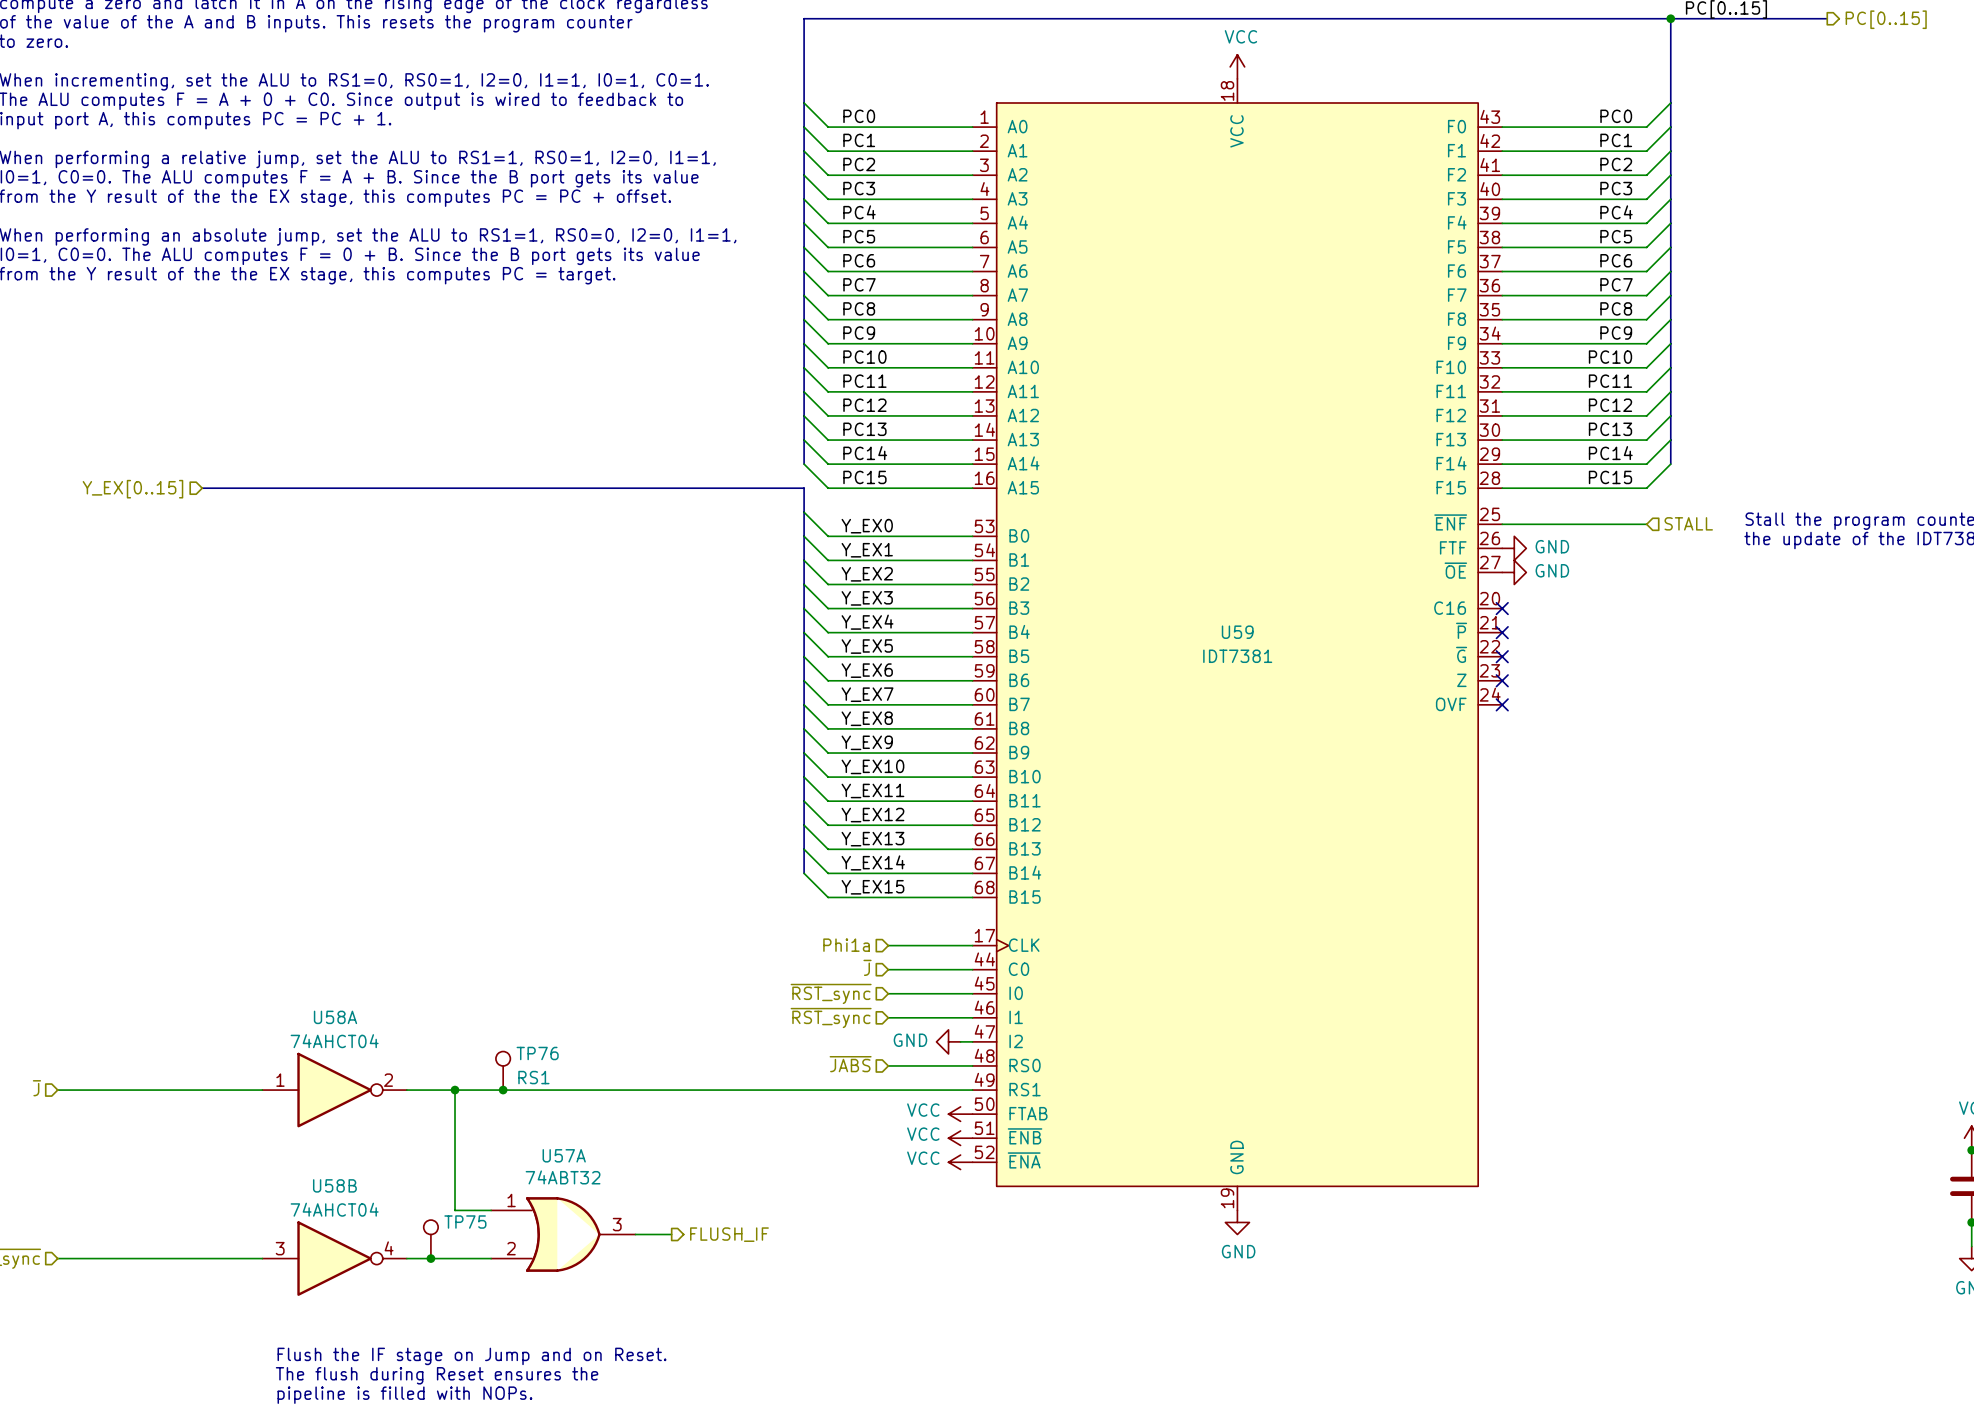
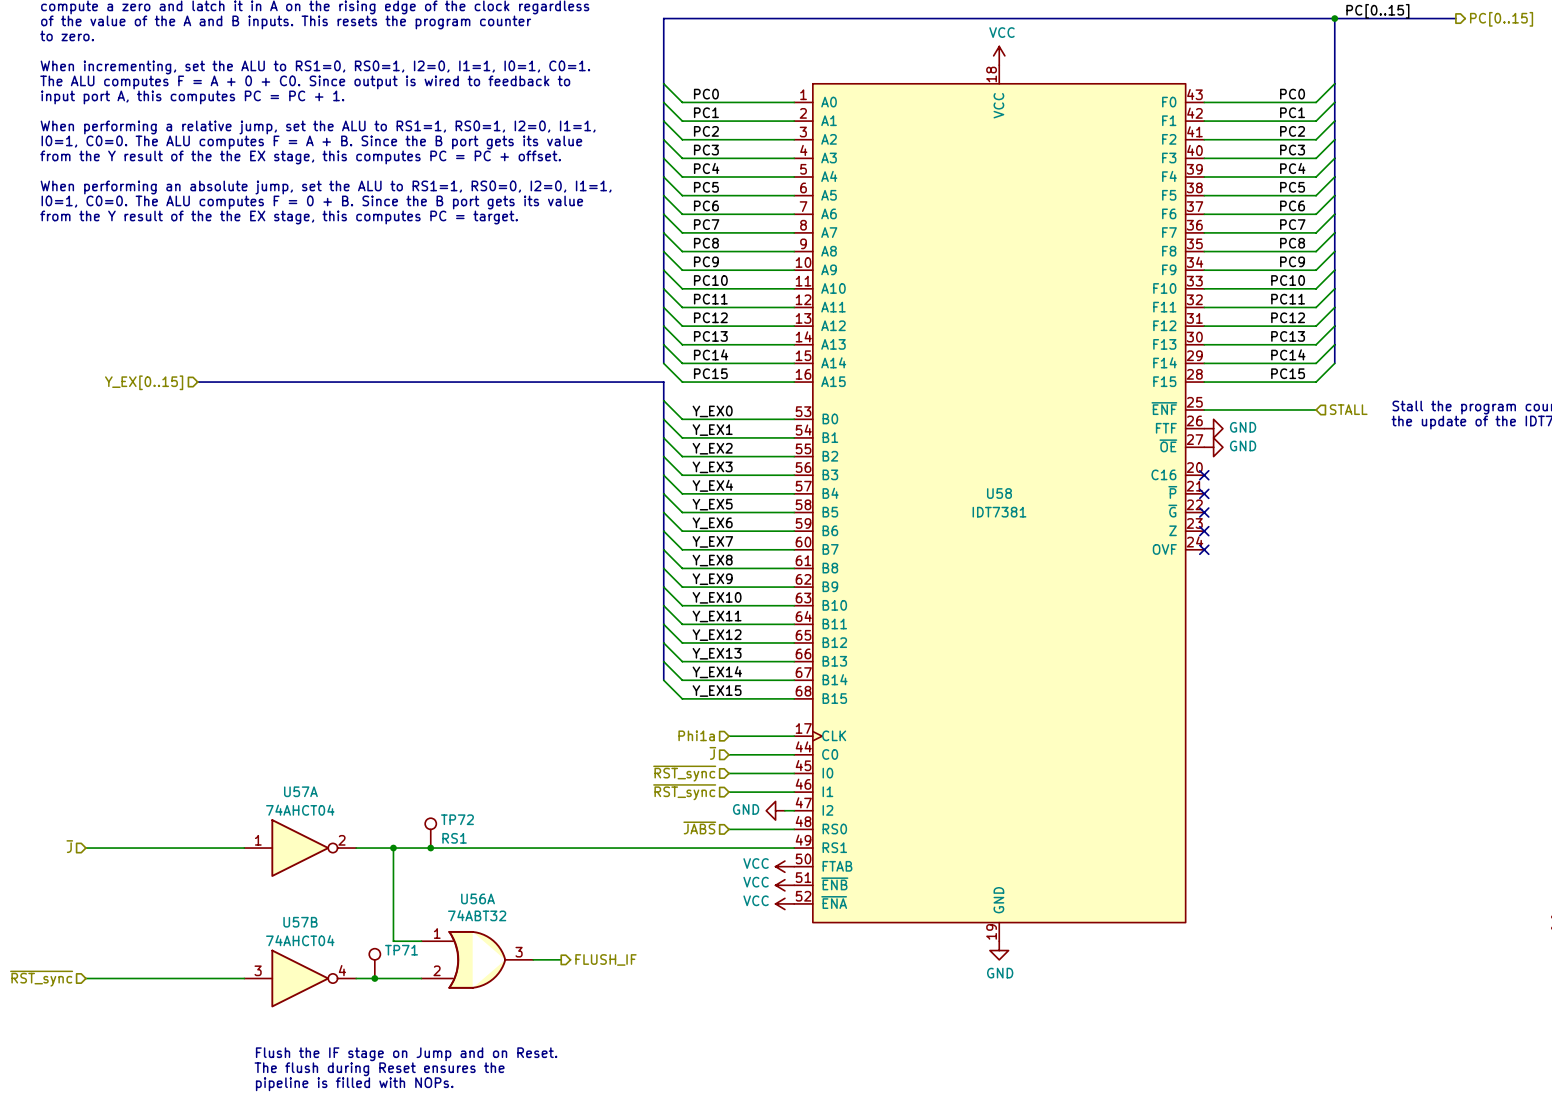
U59 name: U59 (1237, 632) -> U58 (999, 493)
U58A name: U58A (335, 1017) -> U57A (300, 791)
TP76 name: TP76 (537, 1053) -> TP72 (457, 819)
U57A name: U57A (564, 1155) -> U56A (478, 898)
U58B name: U58B (334, 1185) -> U57B (300, 922)
TP75 name: TP75 (465, 1222) -> TP71 (401, 950)

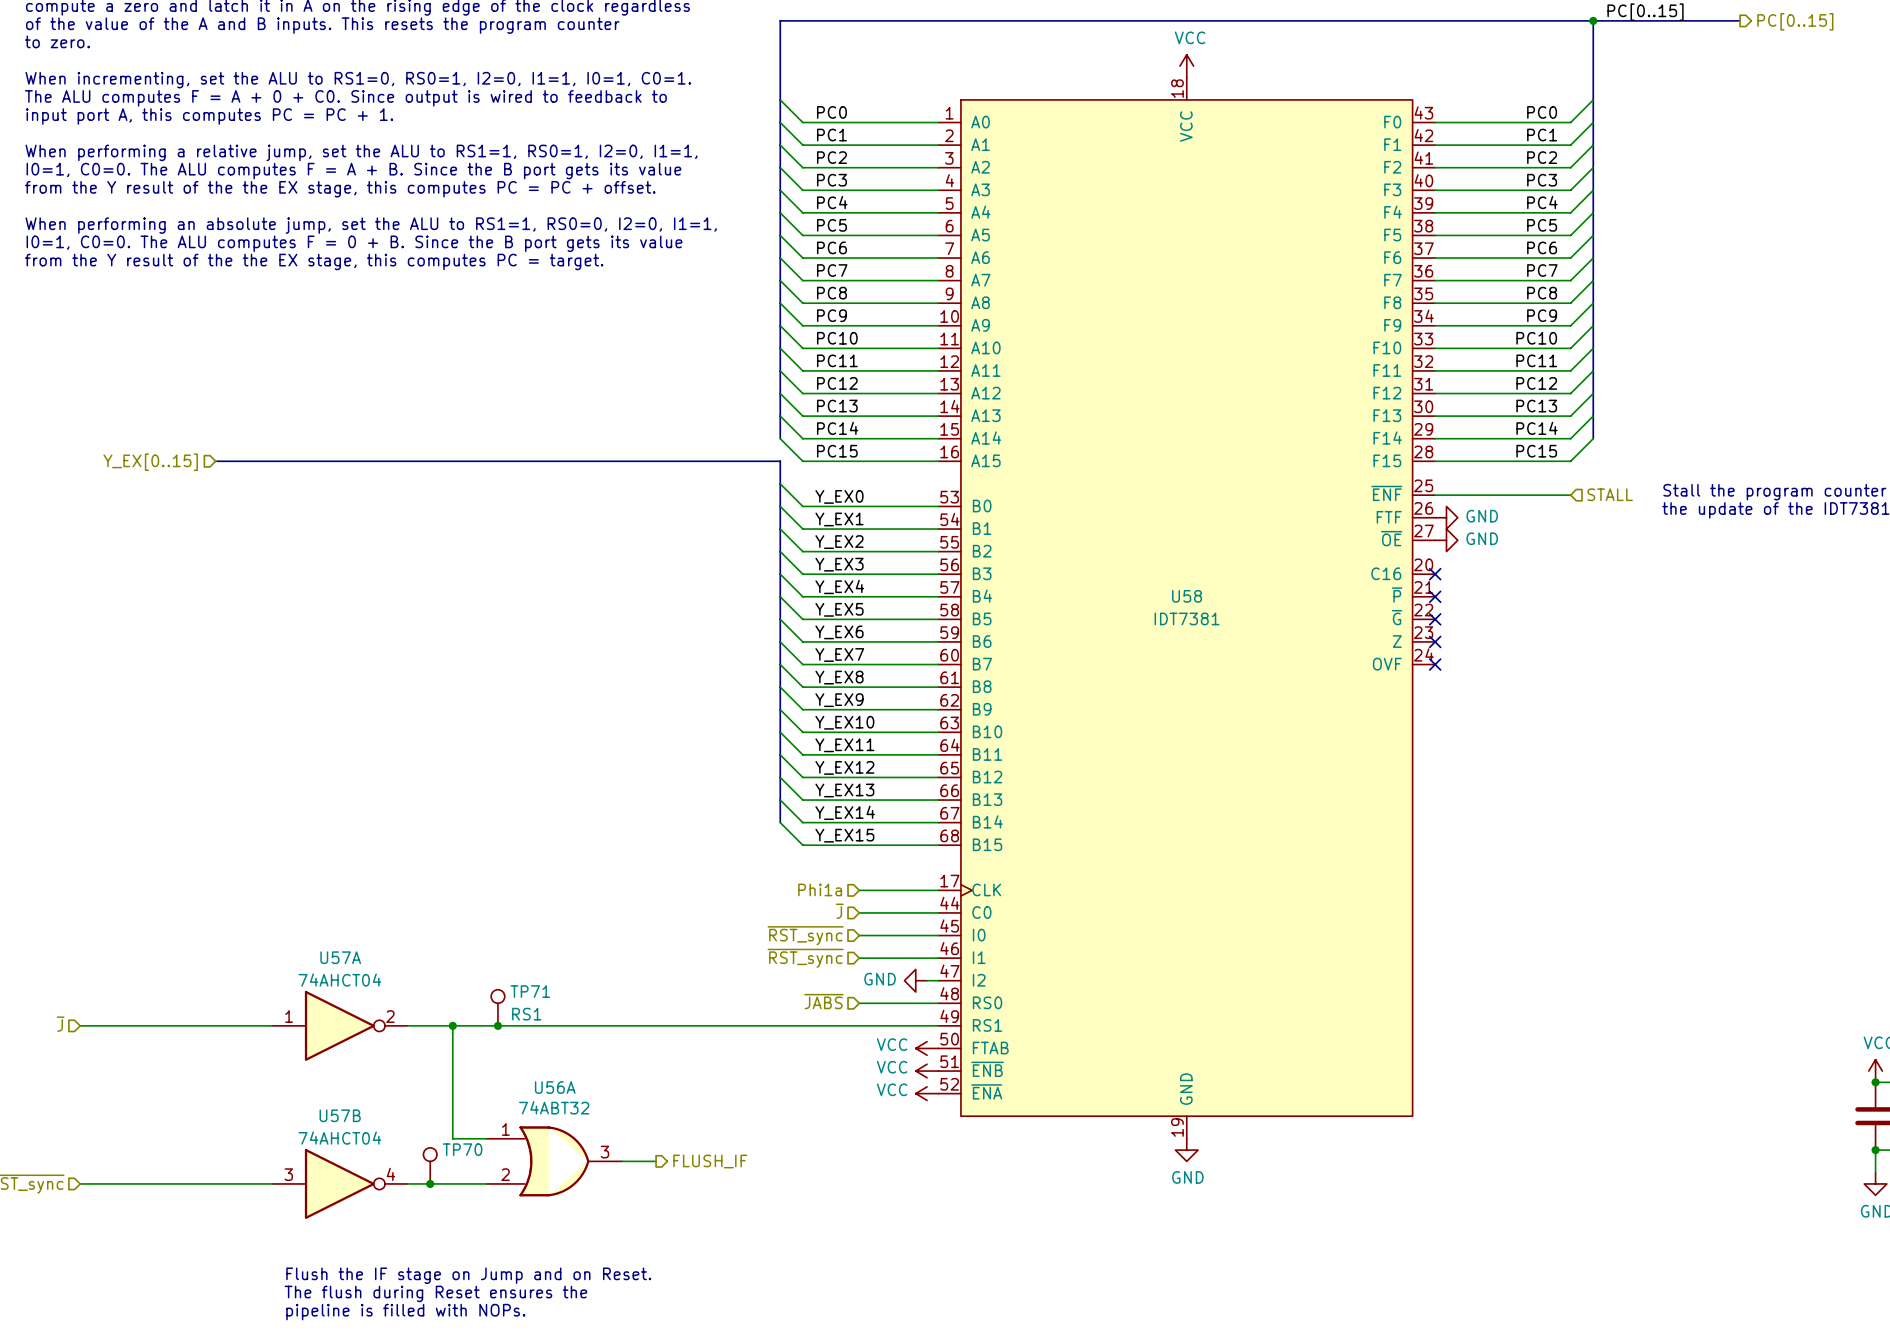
TP72 name: TP72 (457, 819) -> TP71 (530, 991)
TP71 name: TP71 (401, 950) -> TP70 (462, 1149)

